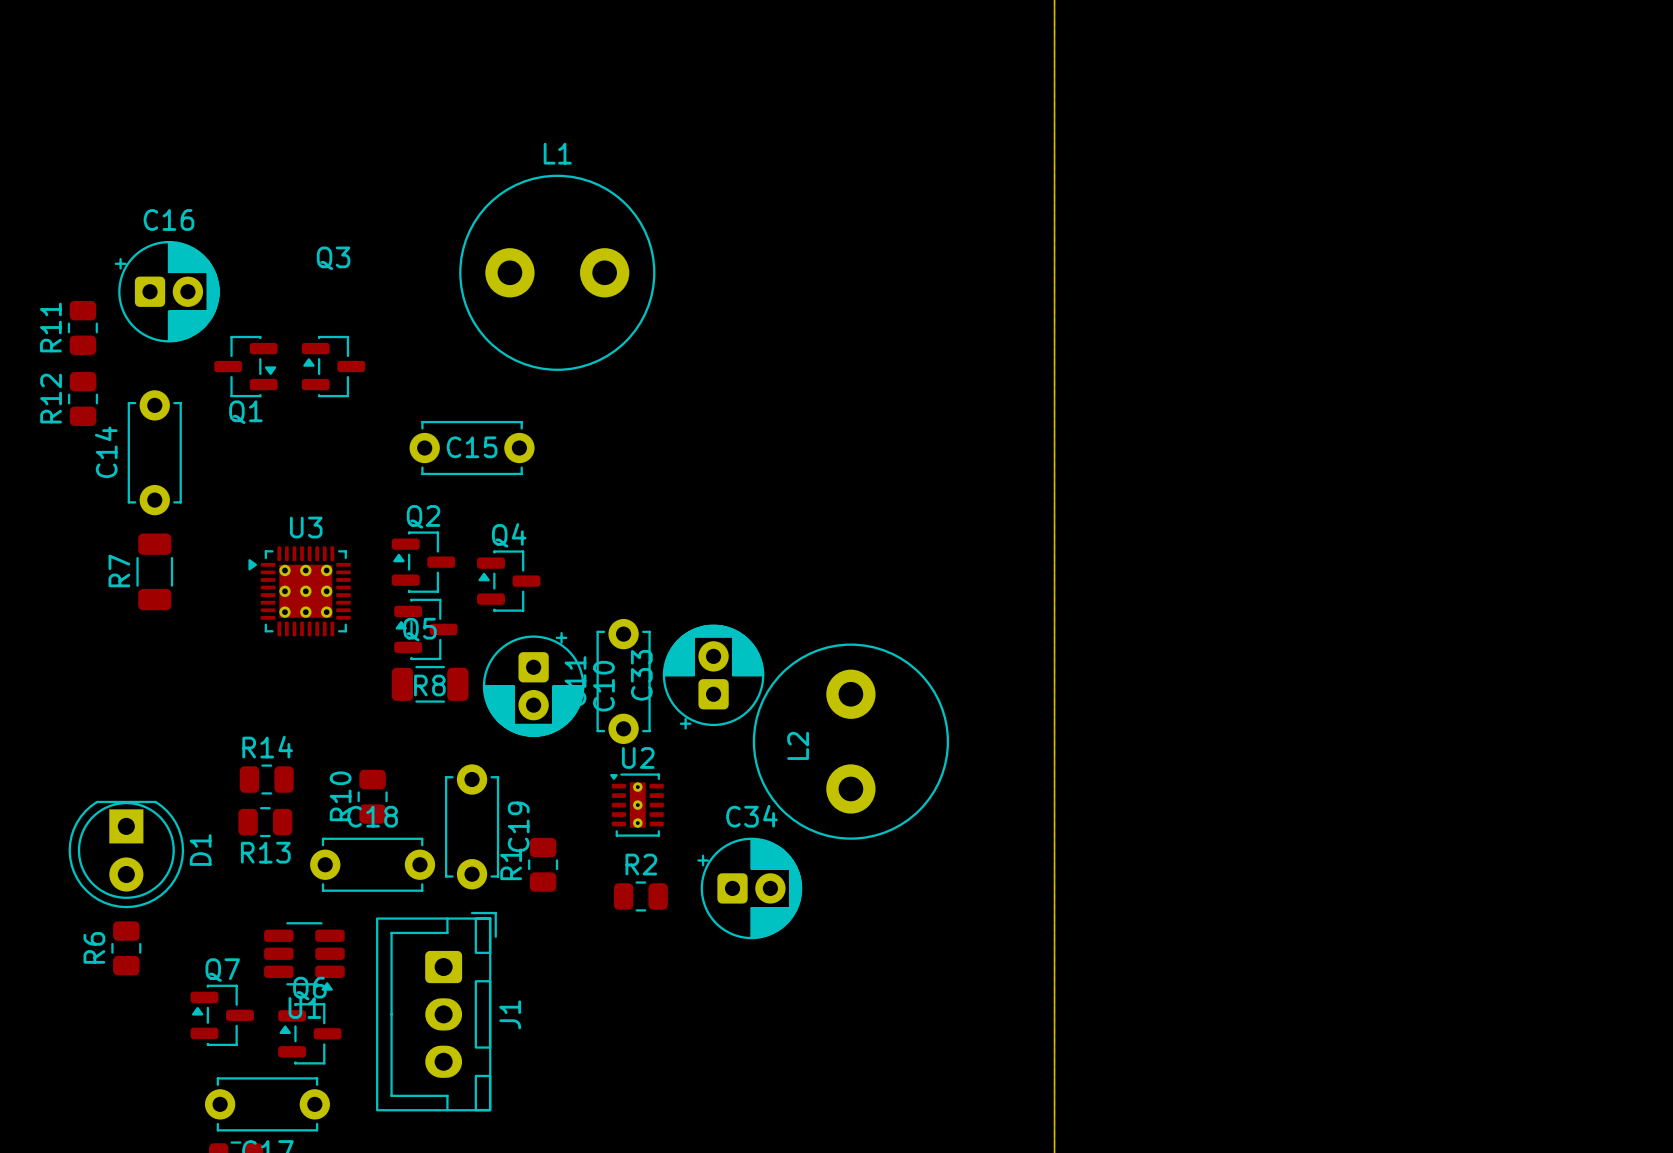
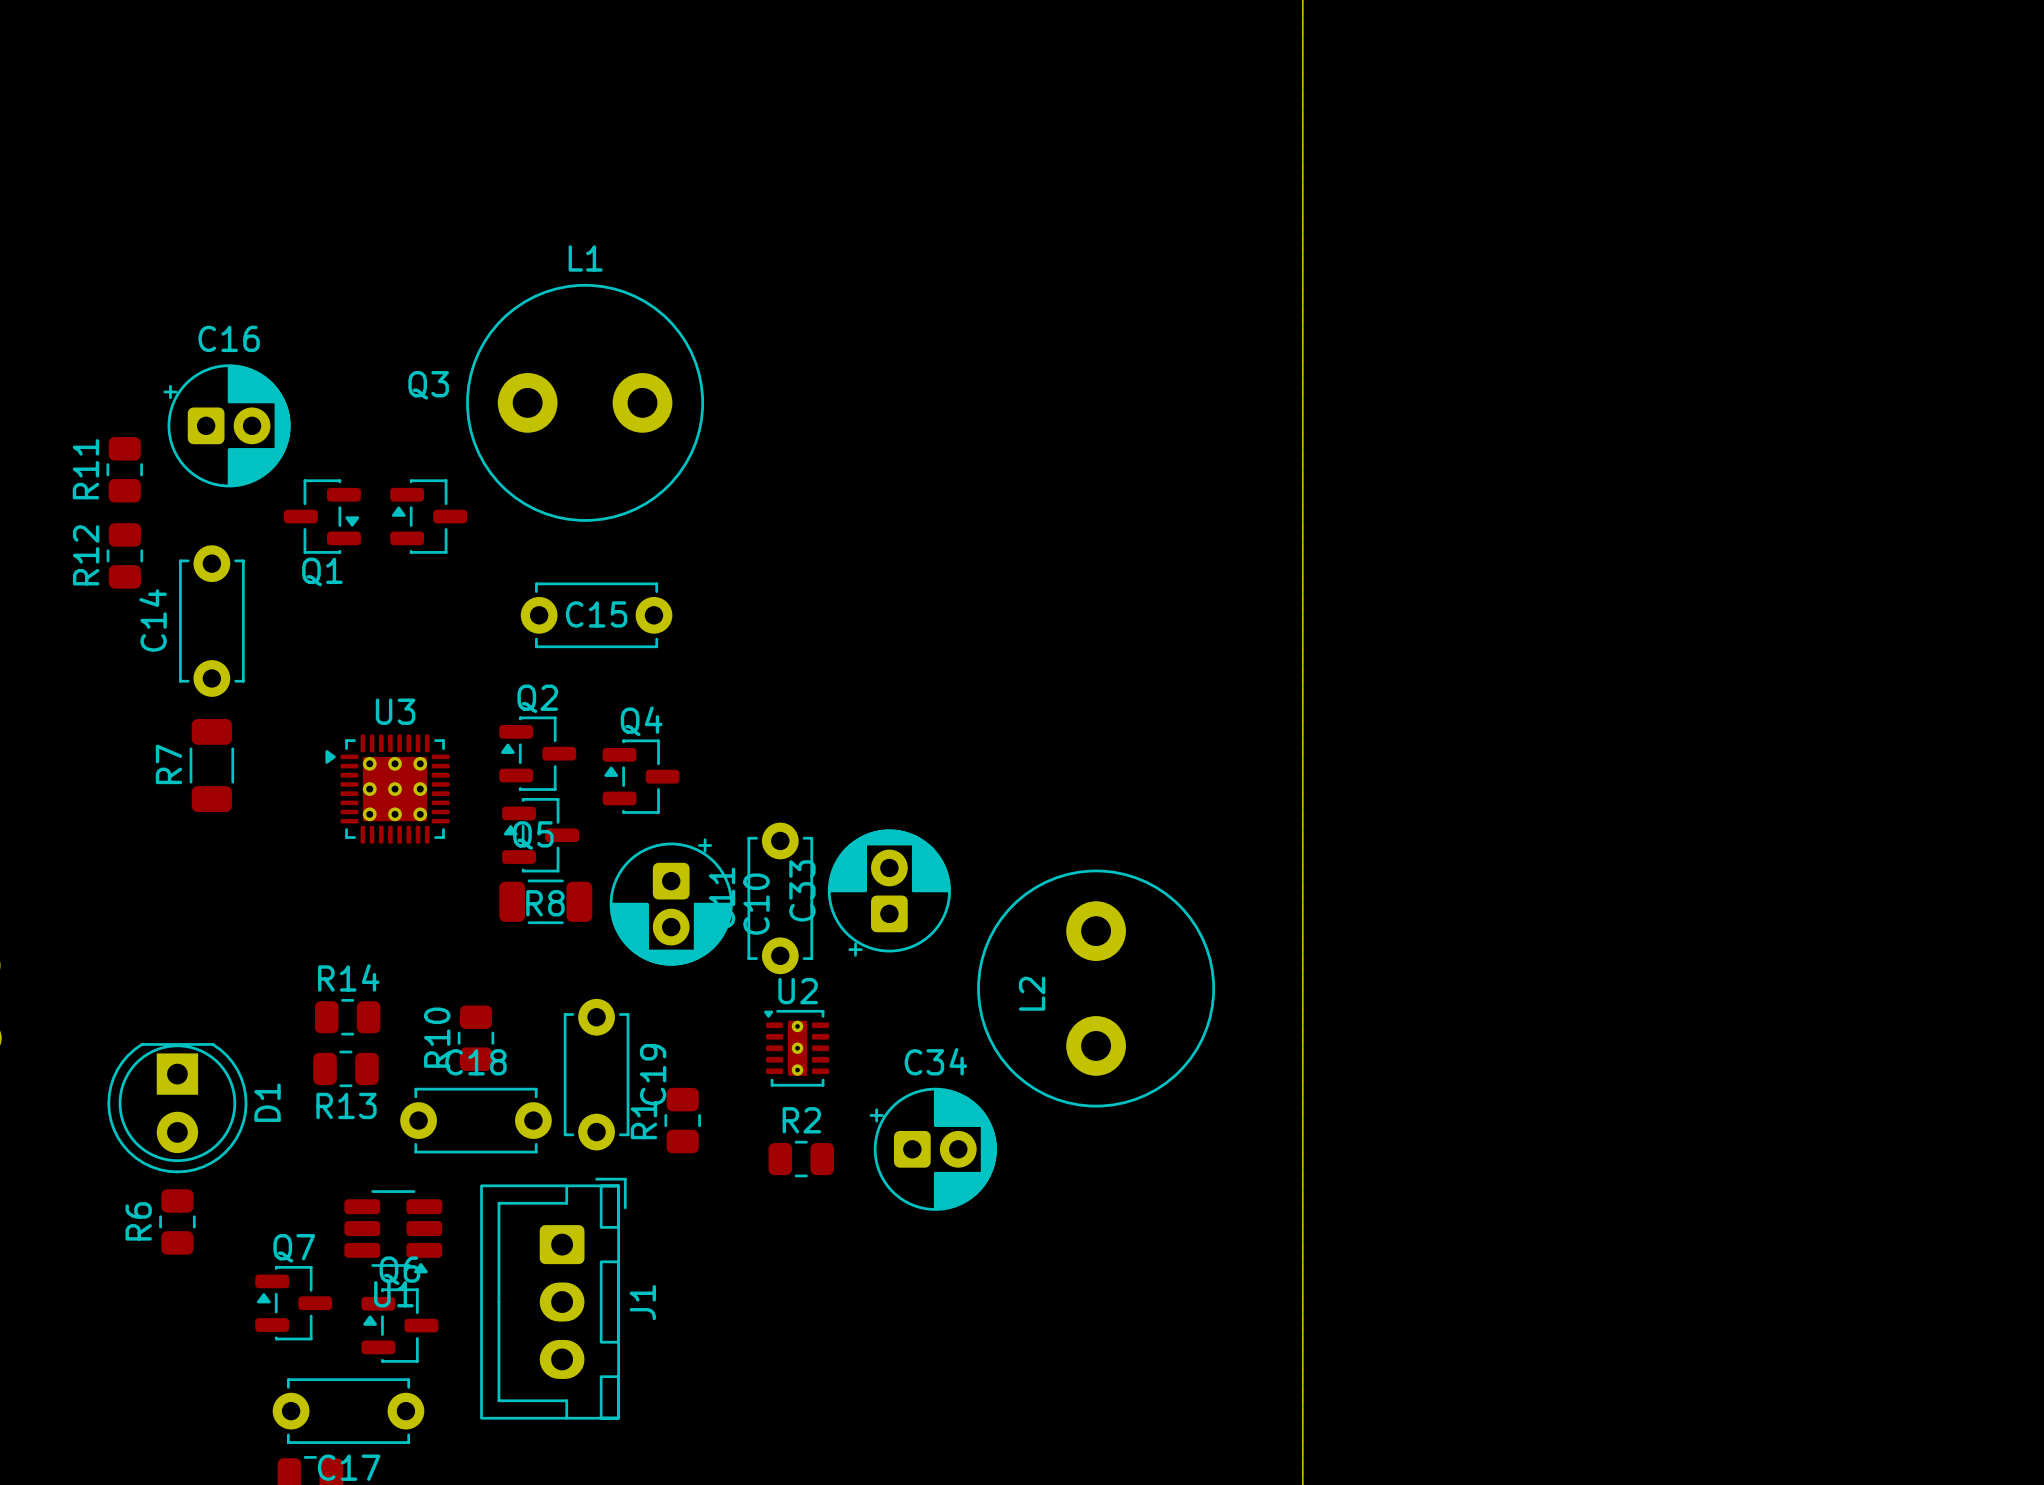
L1 position: (557, 272) -> (585, 402)
L2 position: (850, 741) -> (1096, 988)

